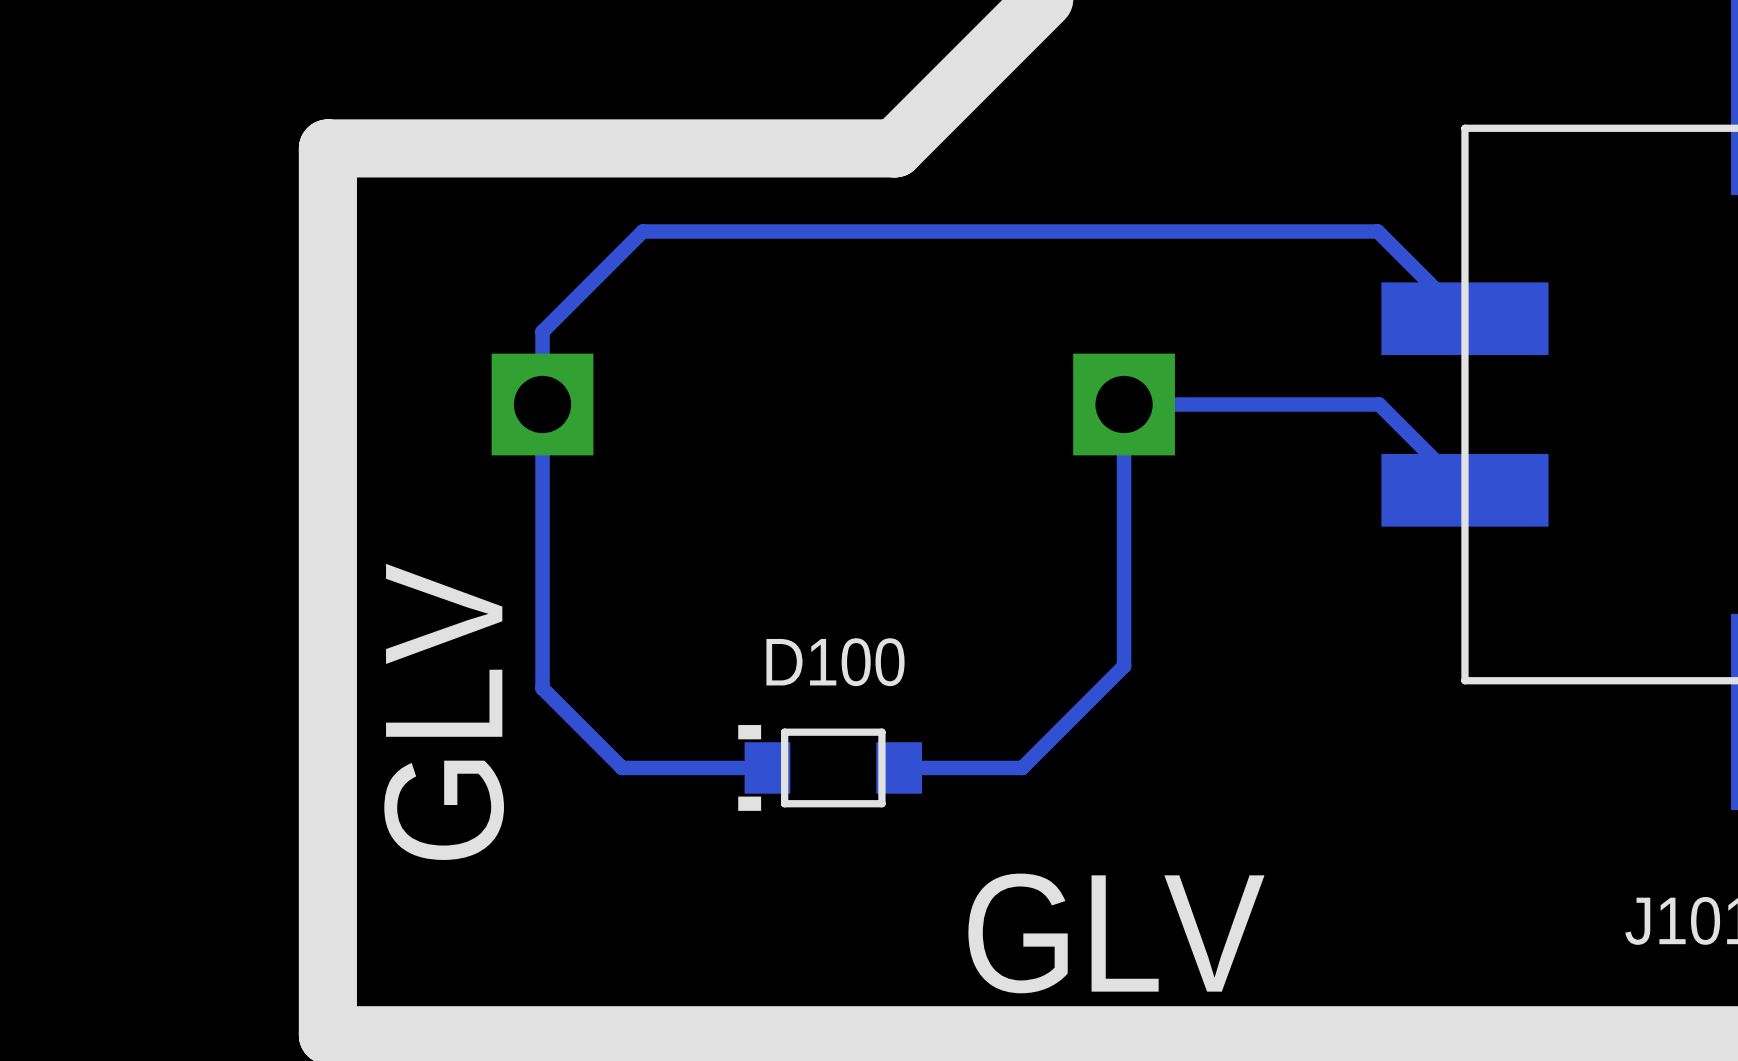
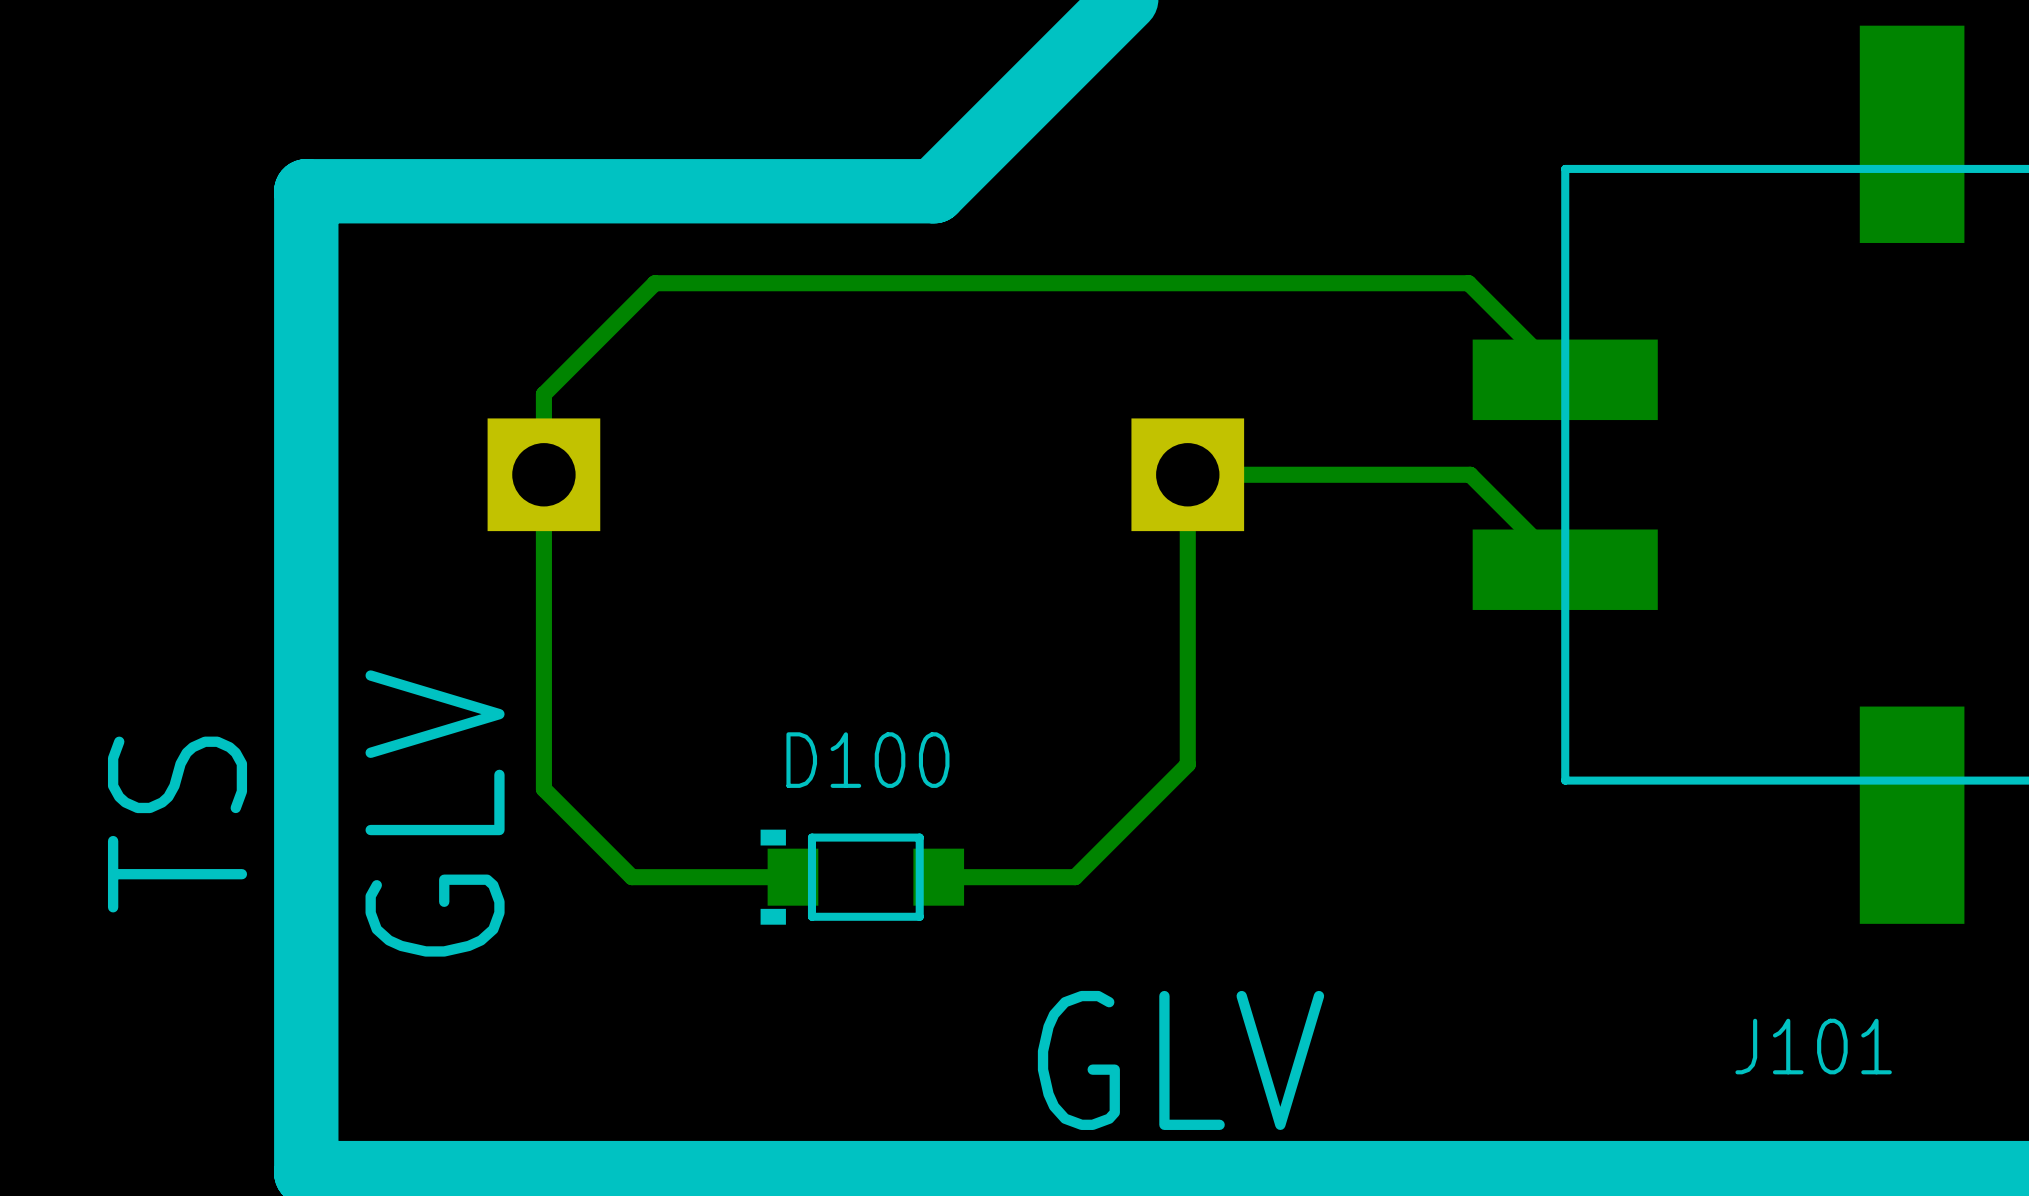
drawing: none -> [107, 736, 248, 913]

